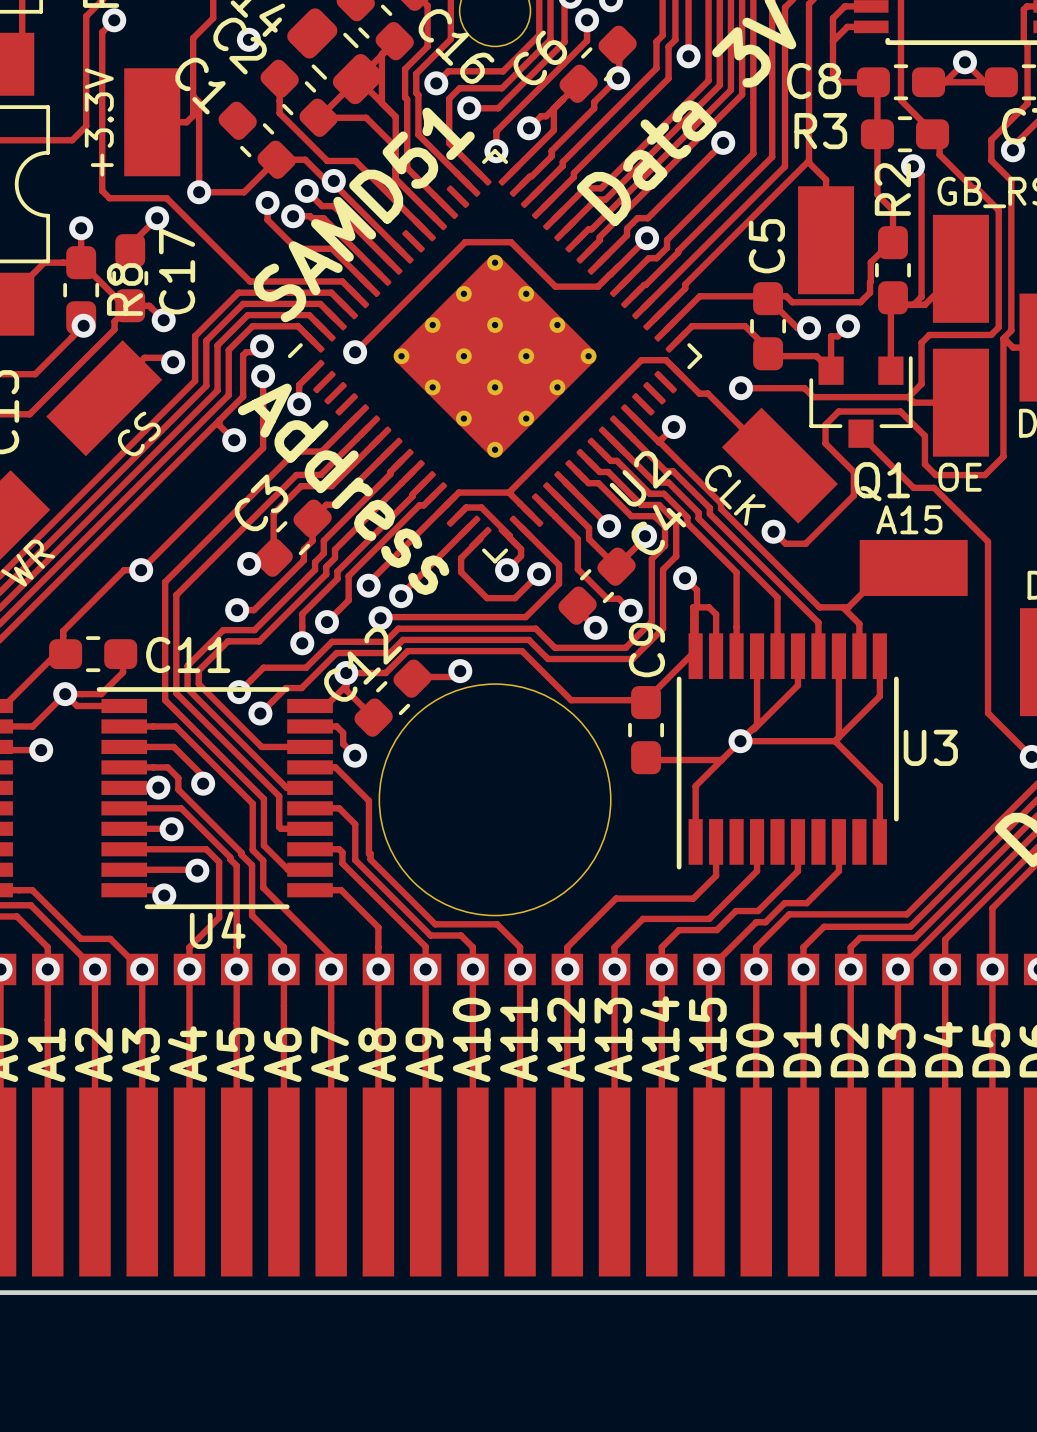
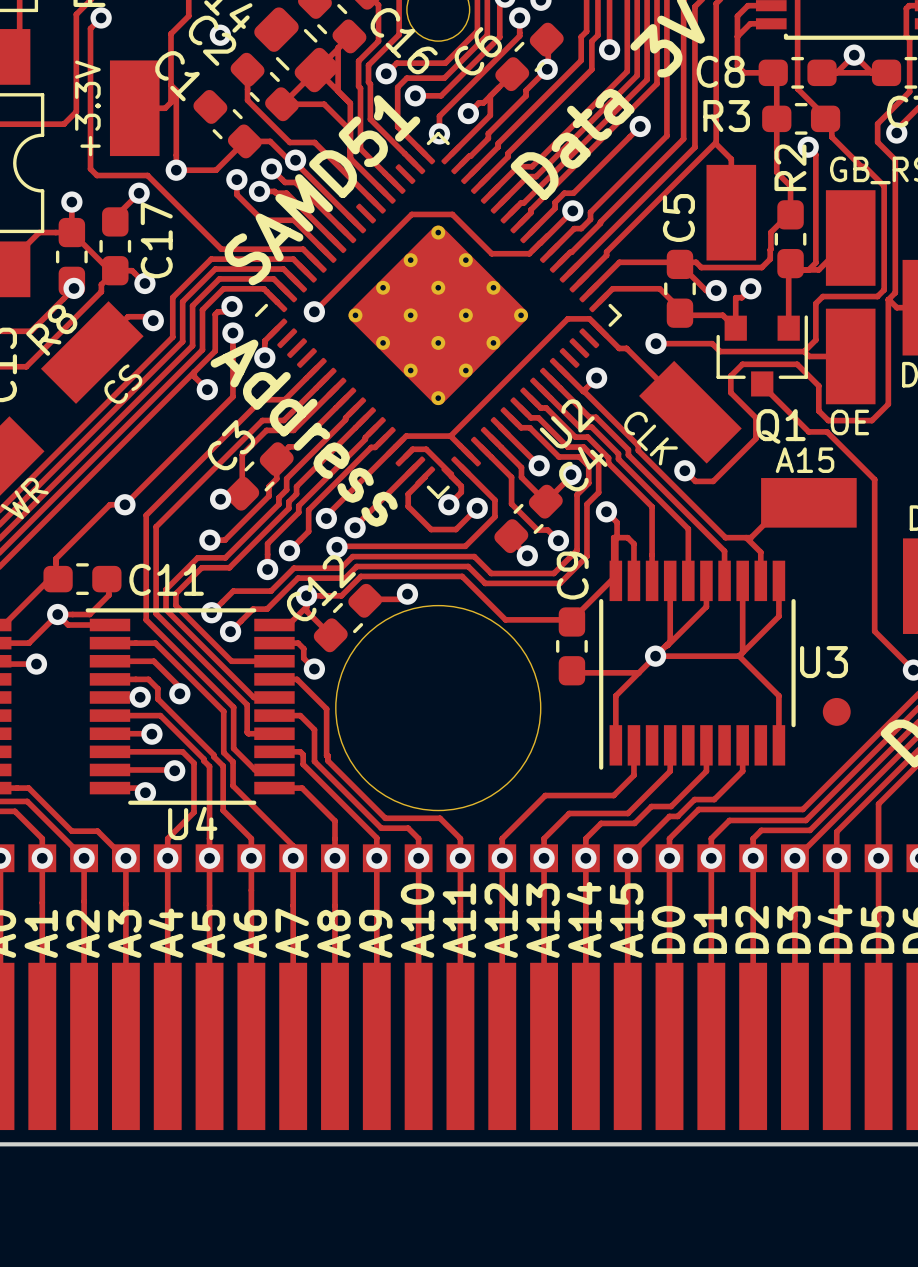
R8 name rotation: 0° (125, 289) -> 45° clockwise (51, 330)
R8 name position: R8 (125, 289) -> R8 (51, 330)
part: none -> (836, 711)

